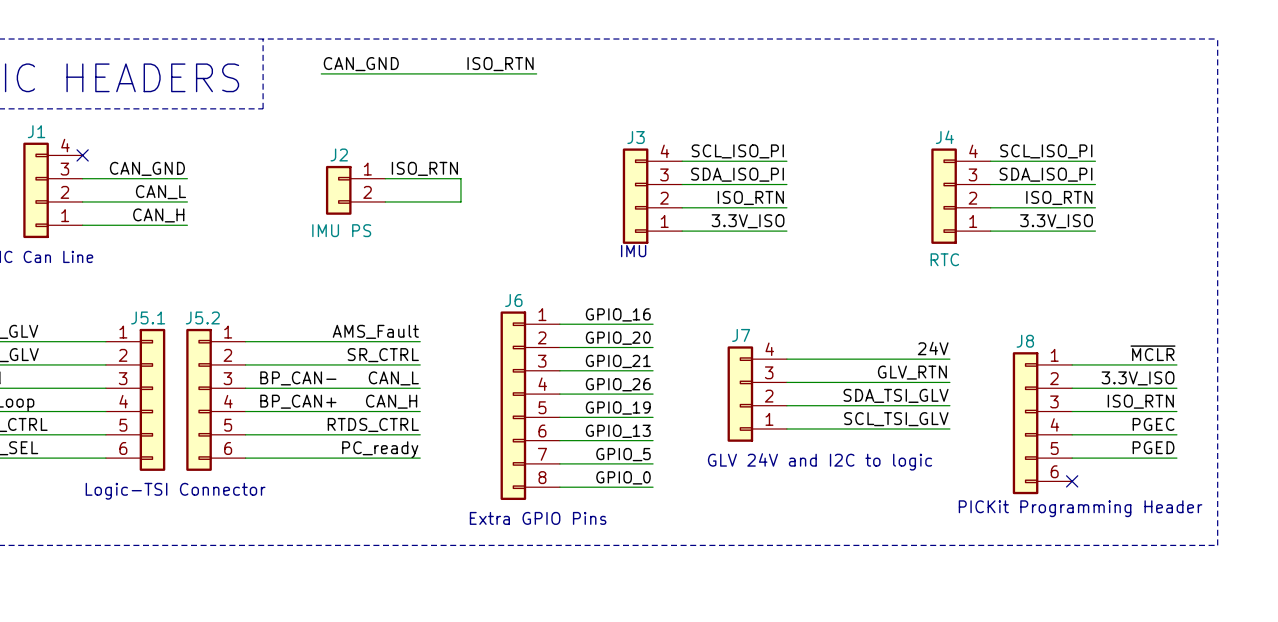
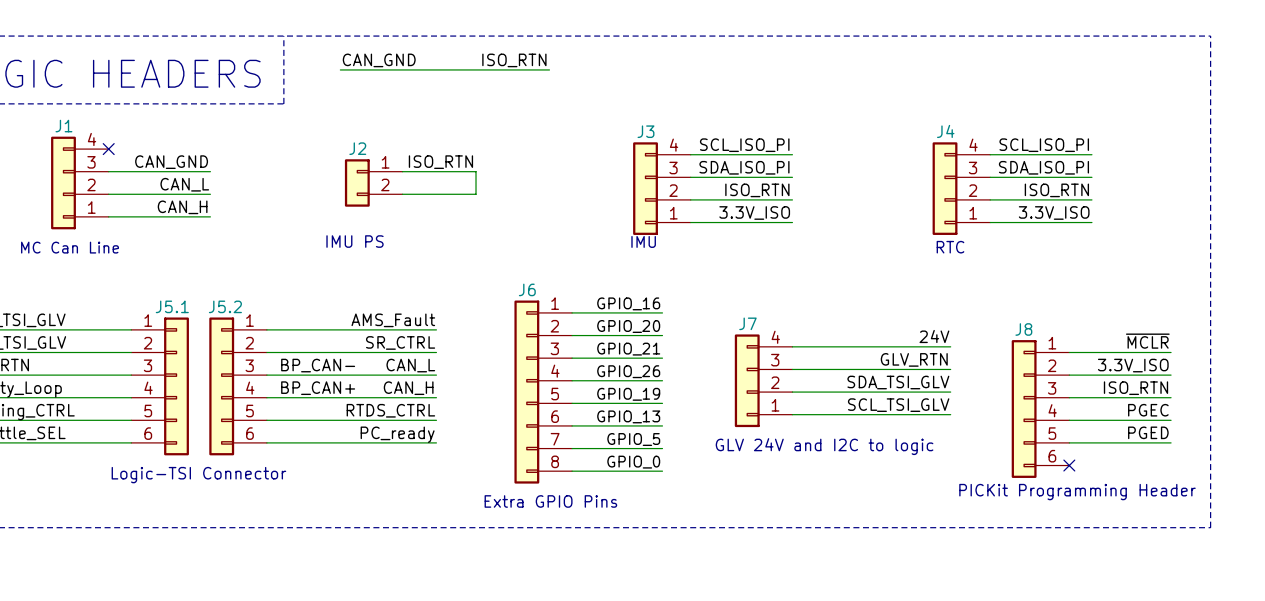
J2 value: IMU PS (341, 230) -> none
text: none -> IMU PS (355, 241)
text: none -> RTC (950, 247)
J4 value: RTC (944, 259) -> none

